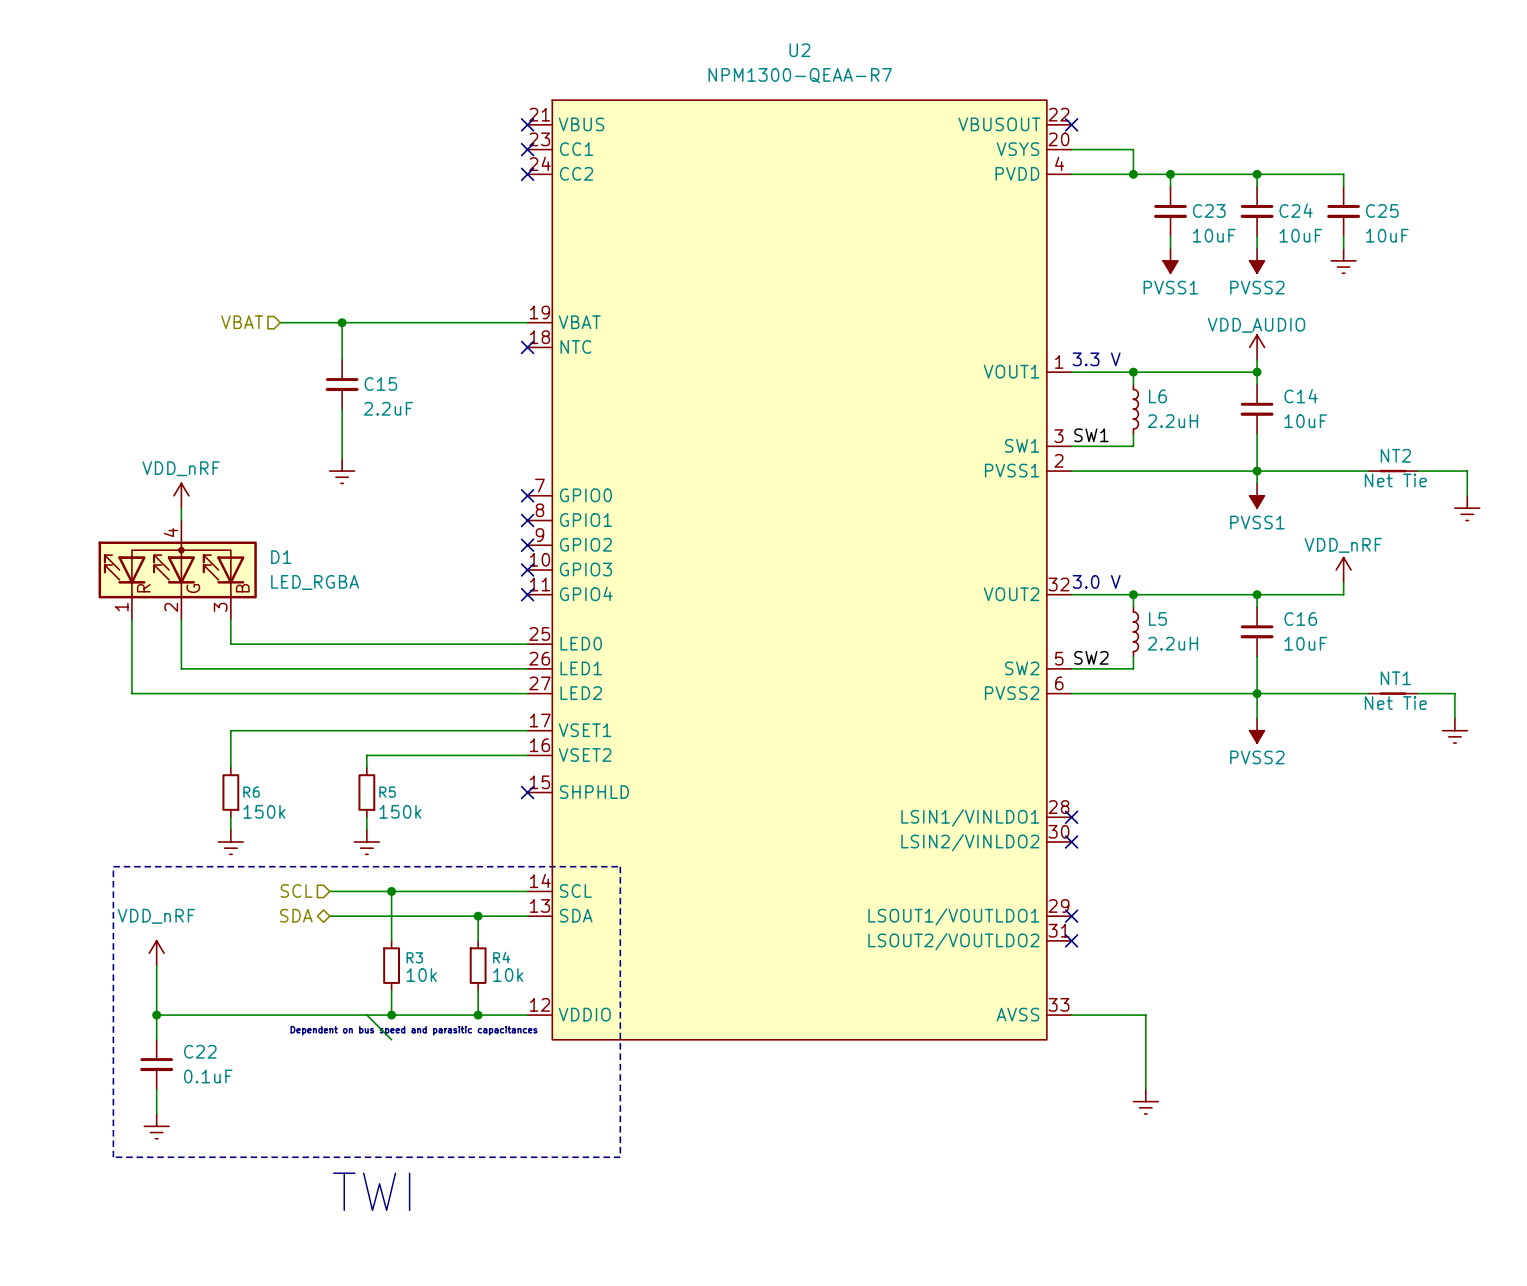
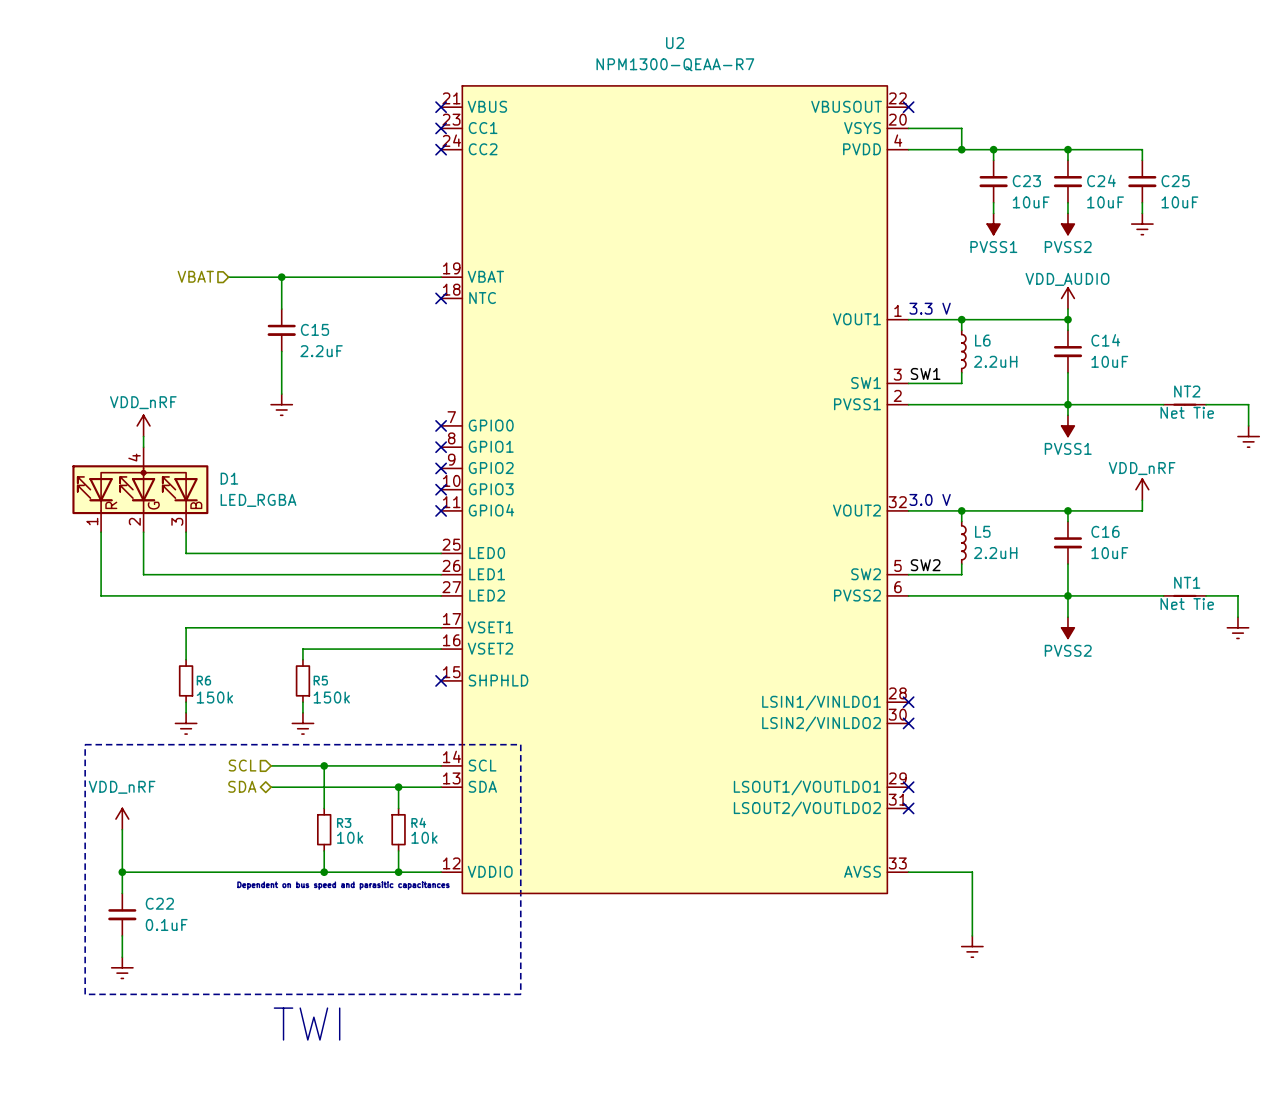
wire: (366, 1015) (391, 1039) -> none

